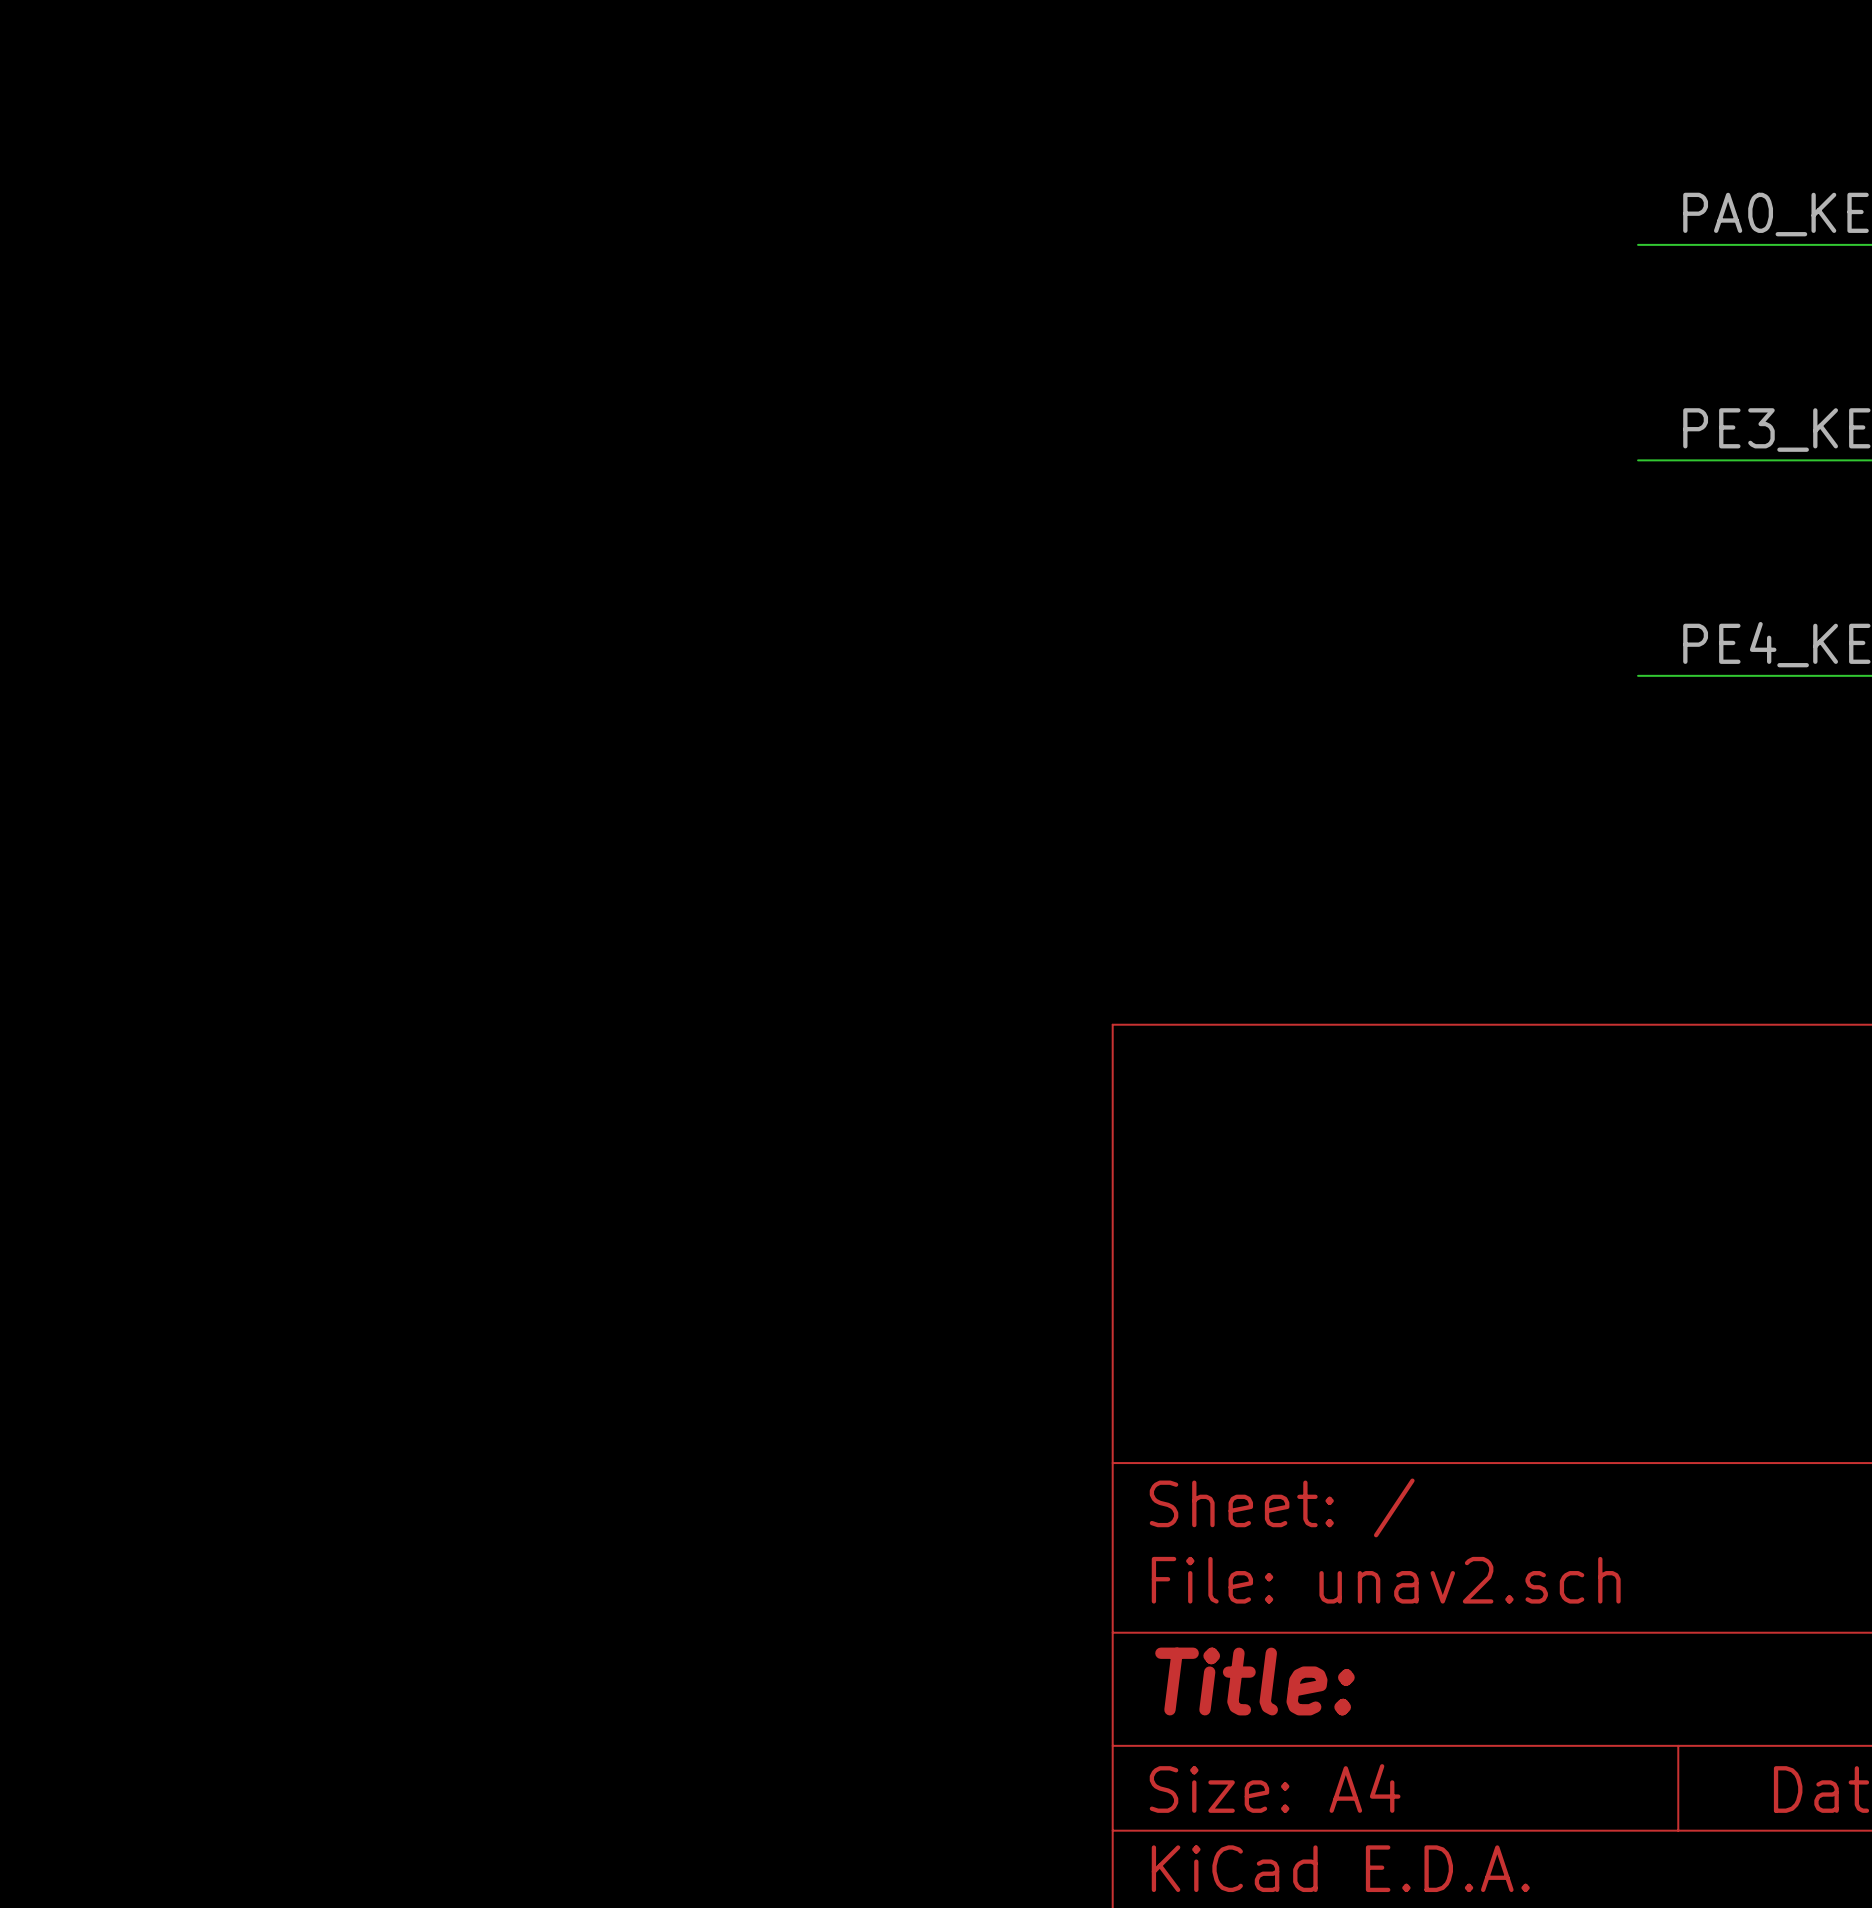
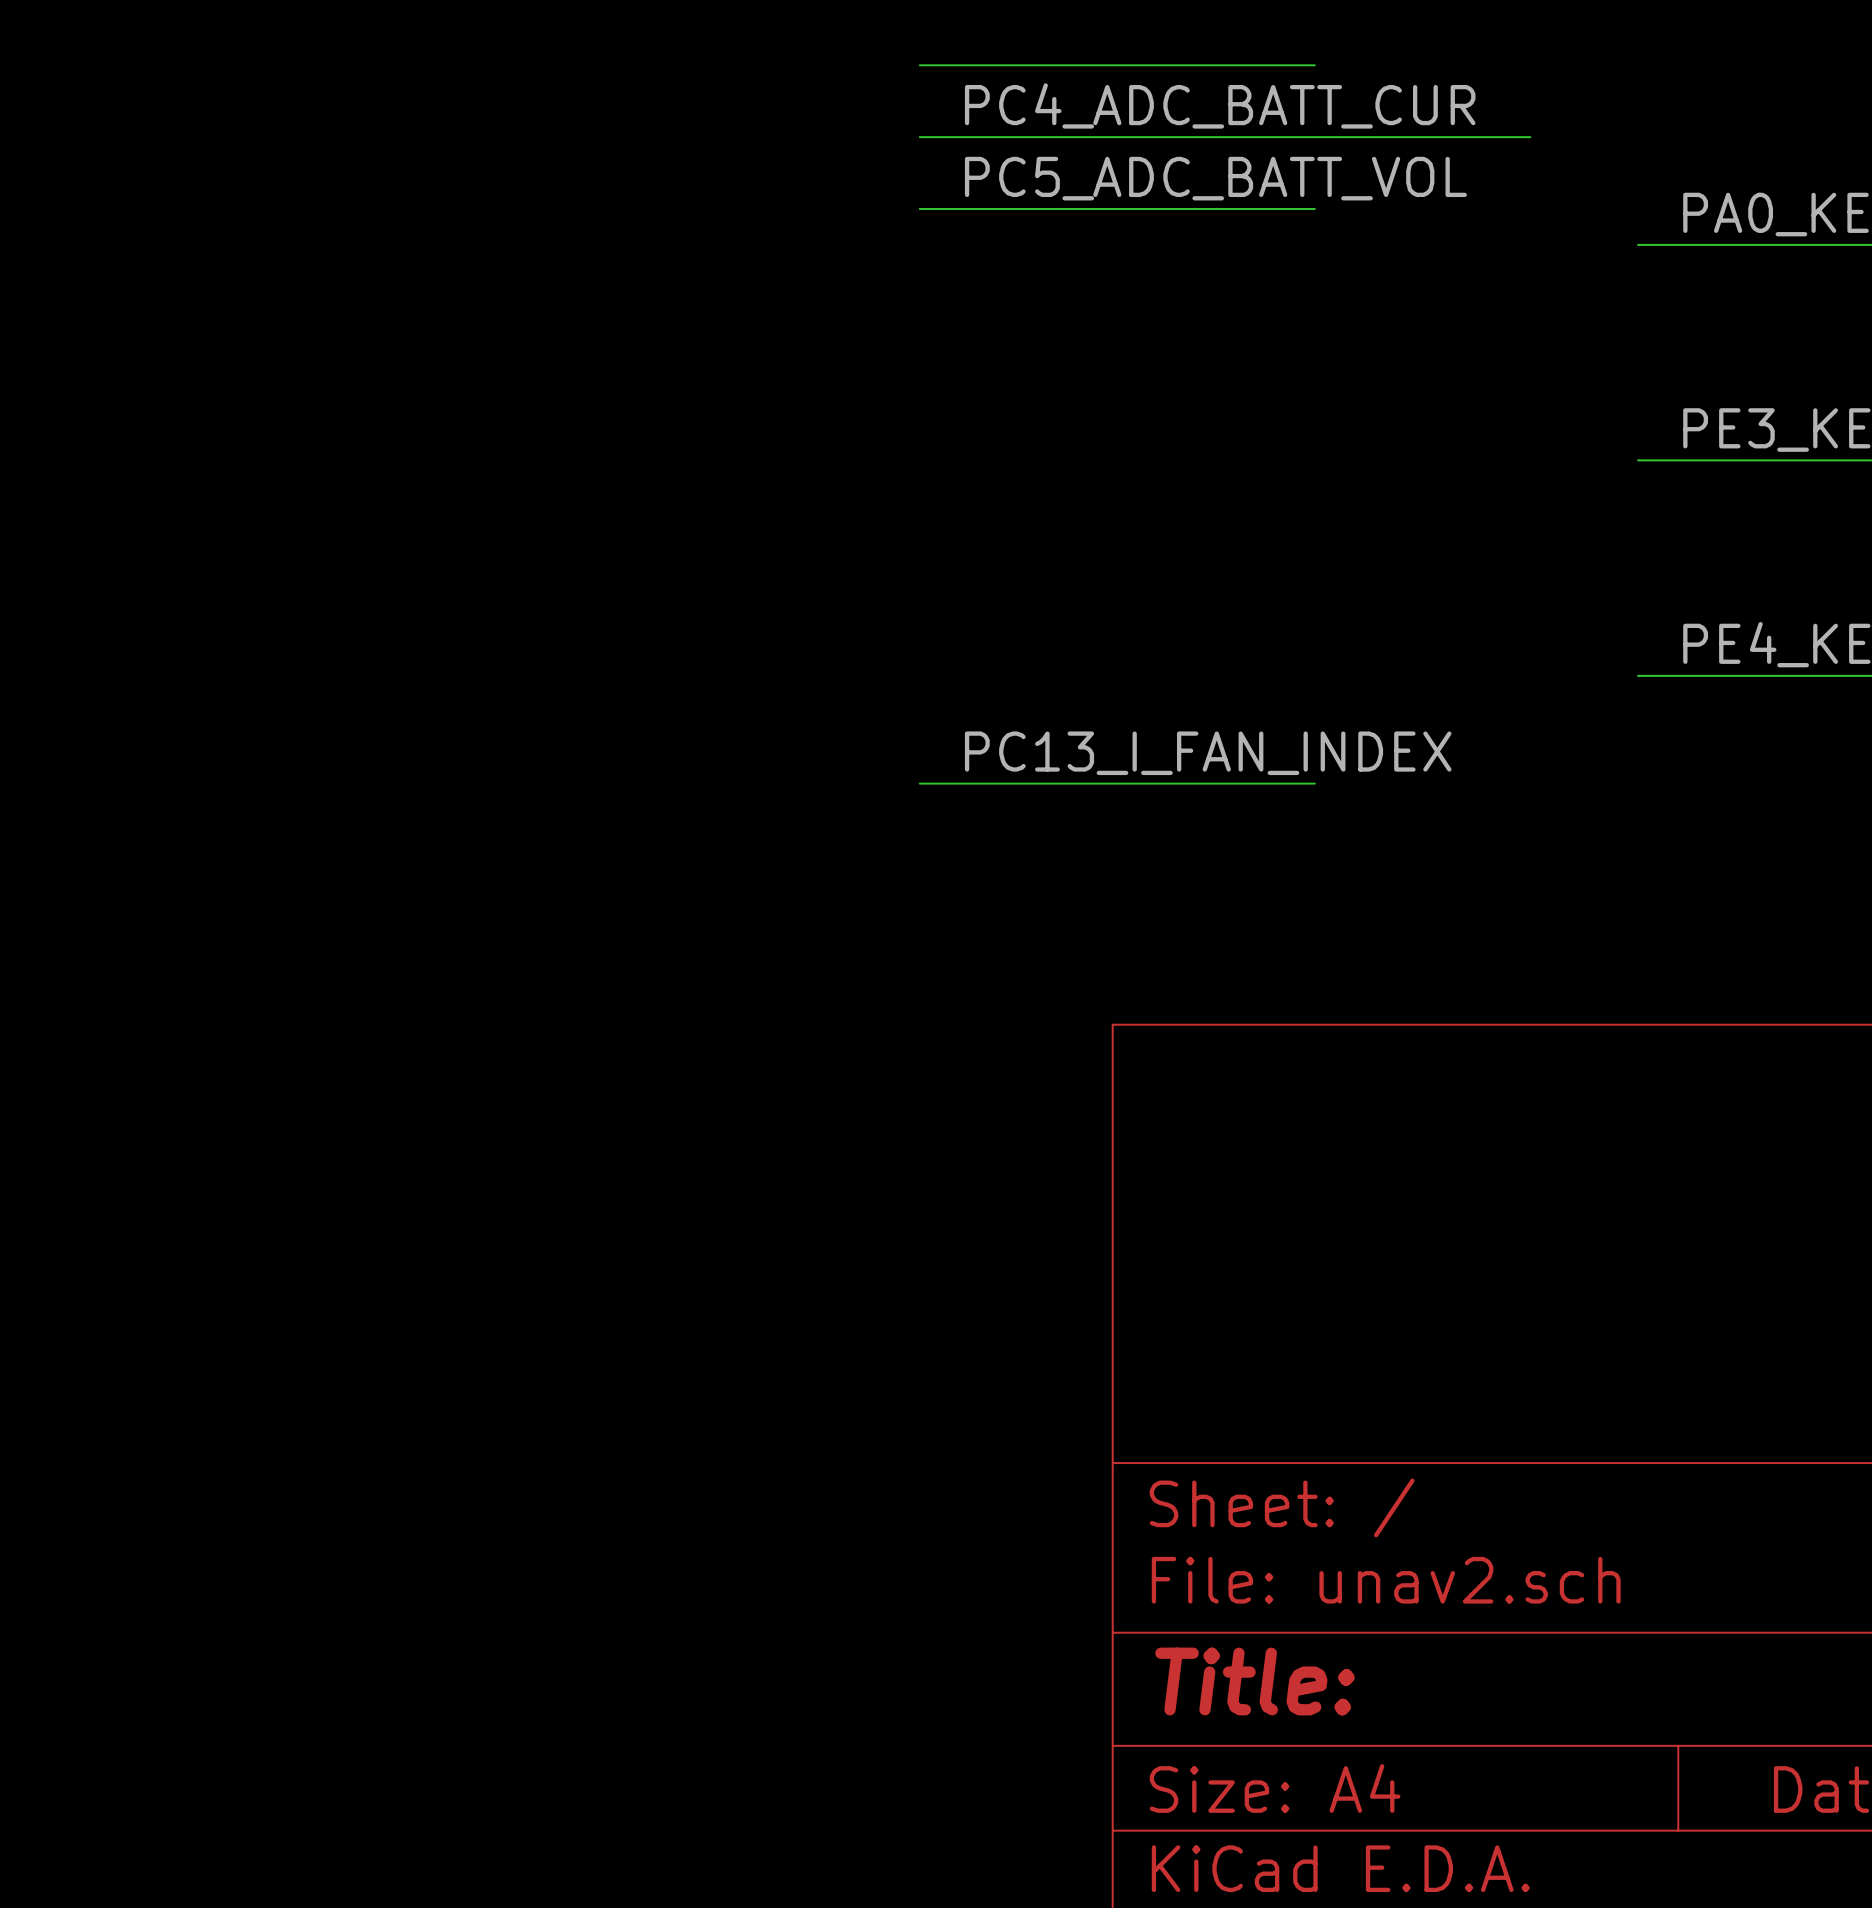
wire: none -> (919, 65) (1314, 65)
label: none -> PC4_ADC_BATT_CUR (1220, 105)
wire: none -> (919, 137) (1530, 137)
label: none -> PC5_ADC_BATT_VOL (1215, 178)
wire: none -> (919, 208) (1314, 208)
label: none -> PC13_I_FAN_INDEX (1208, 753)
wire: none -> (919, 783) (1314, 783)

